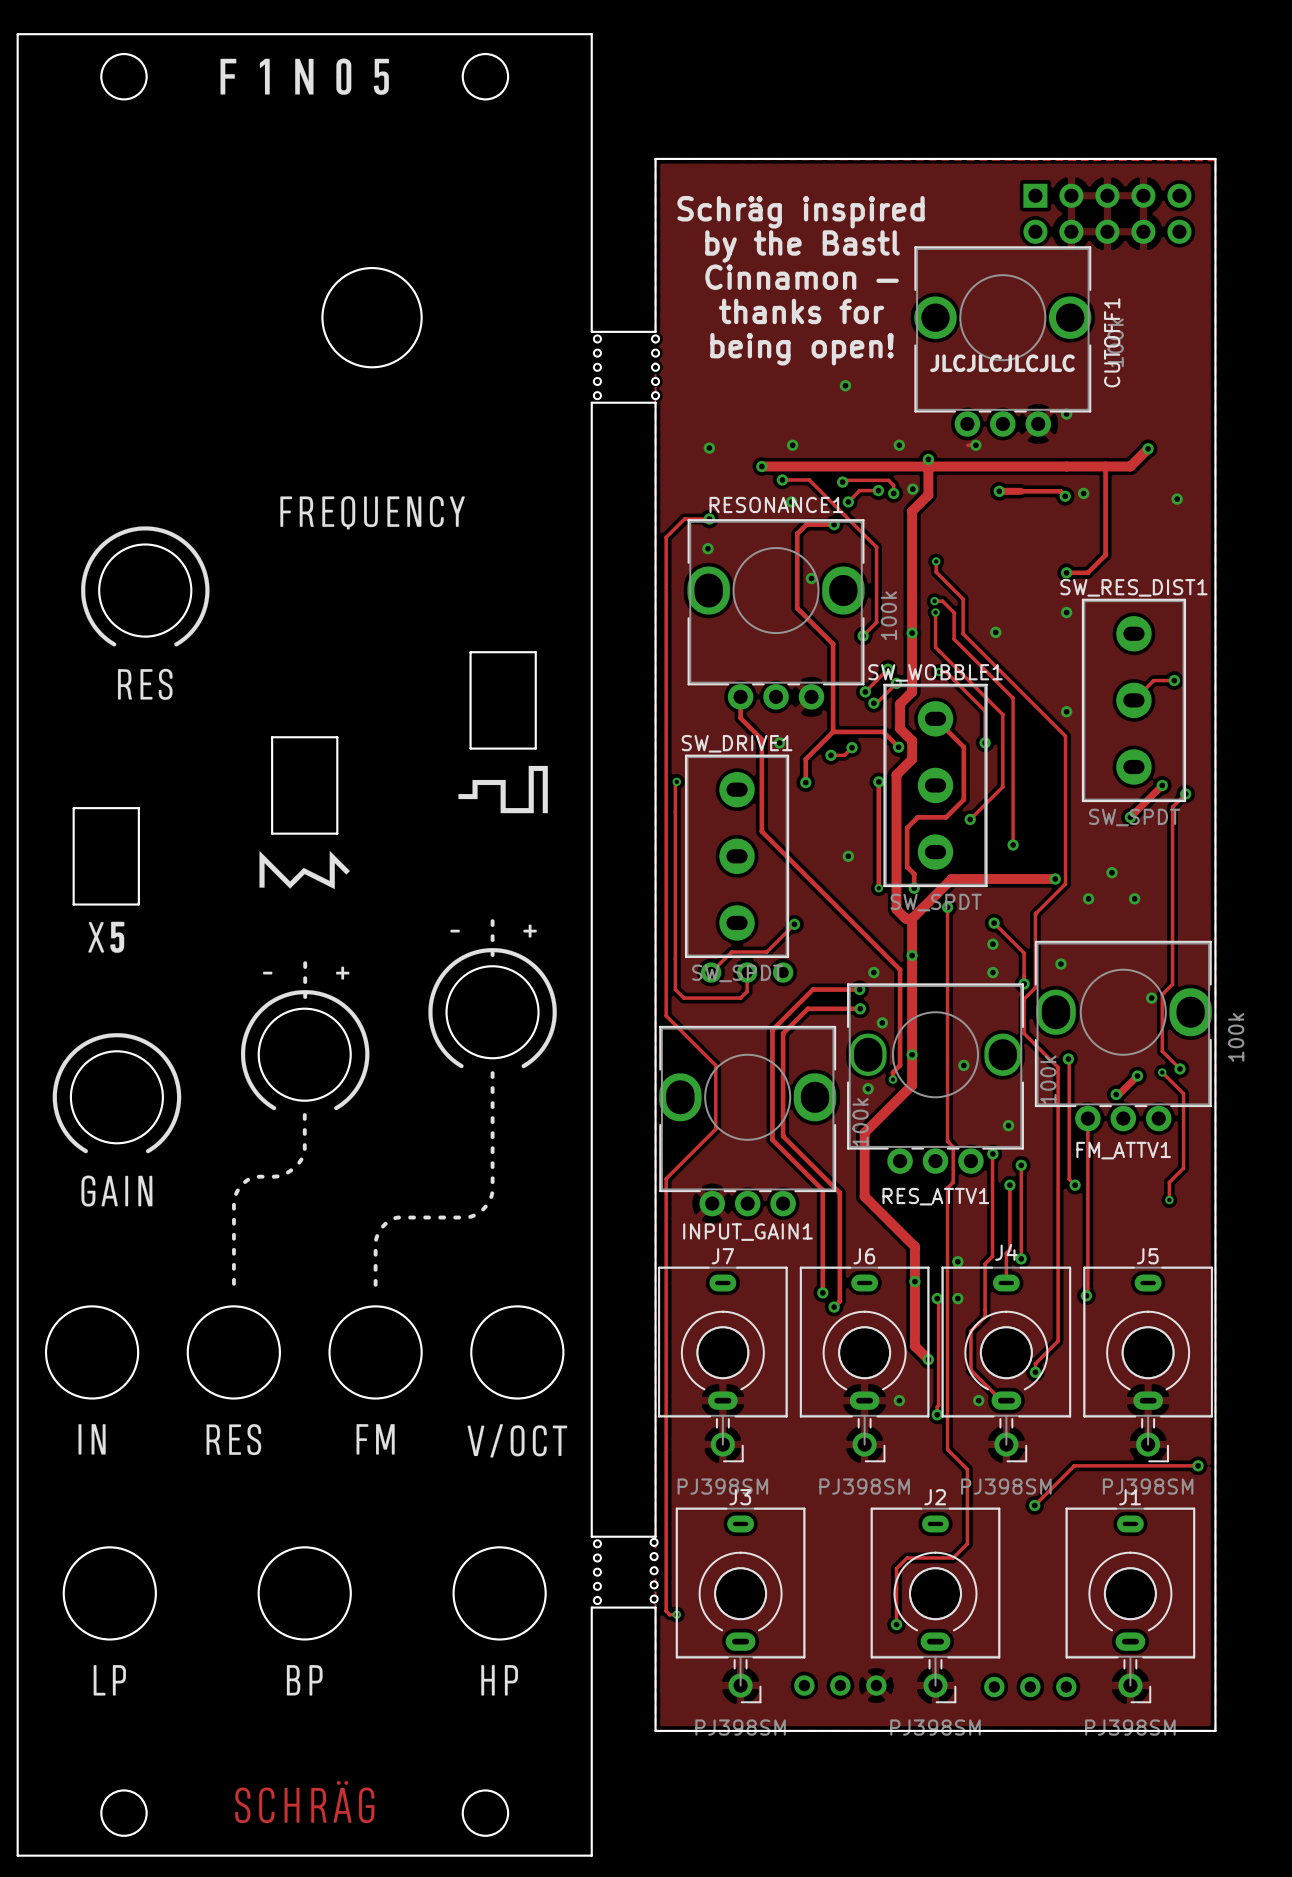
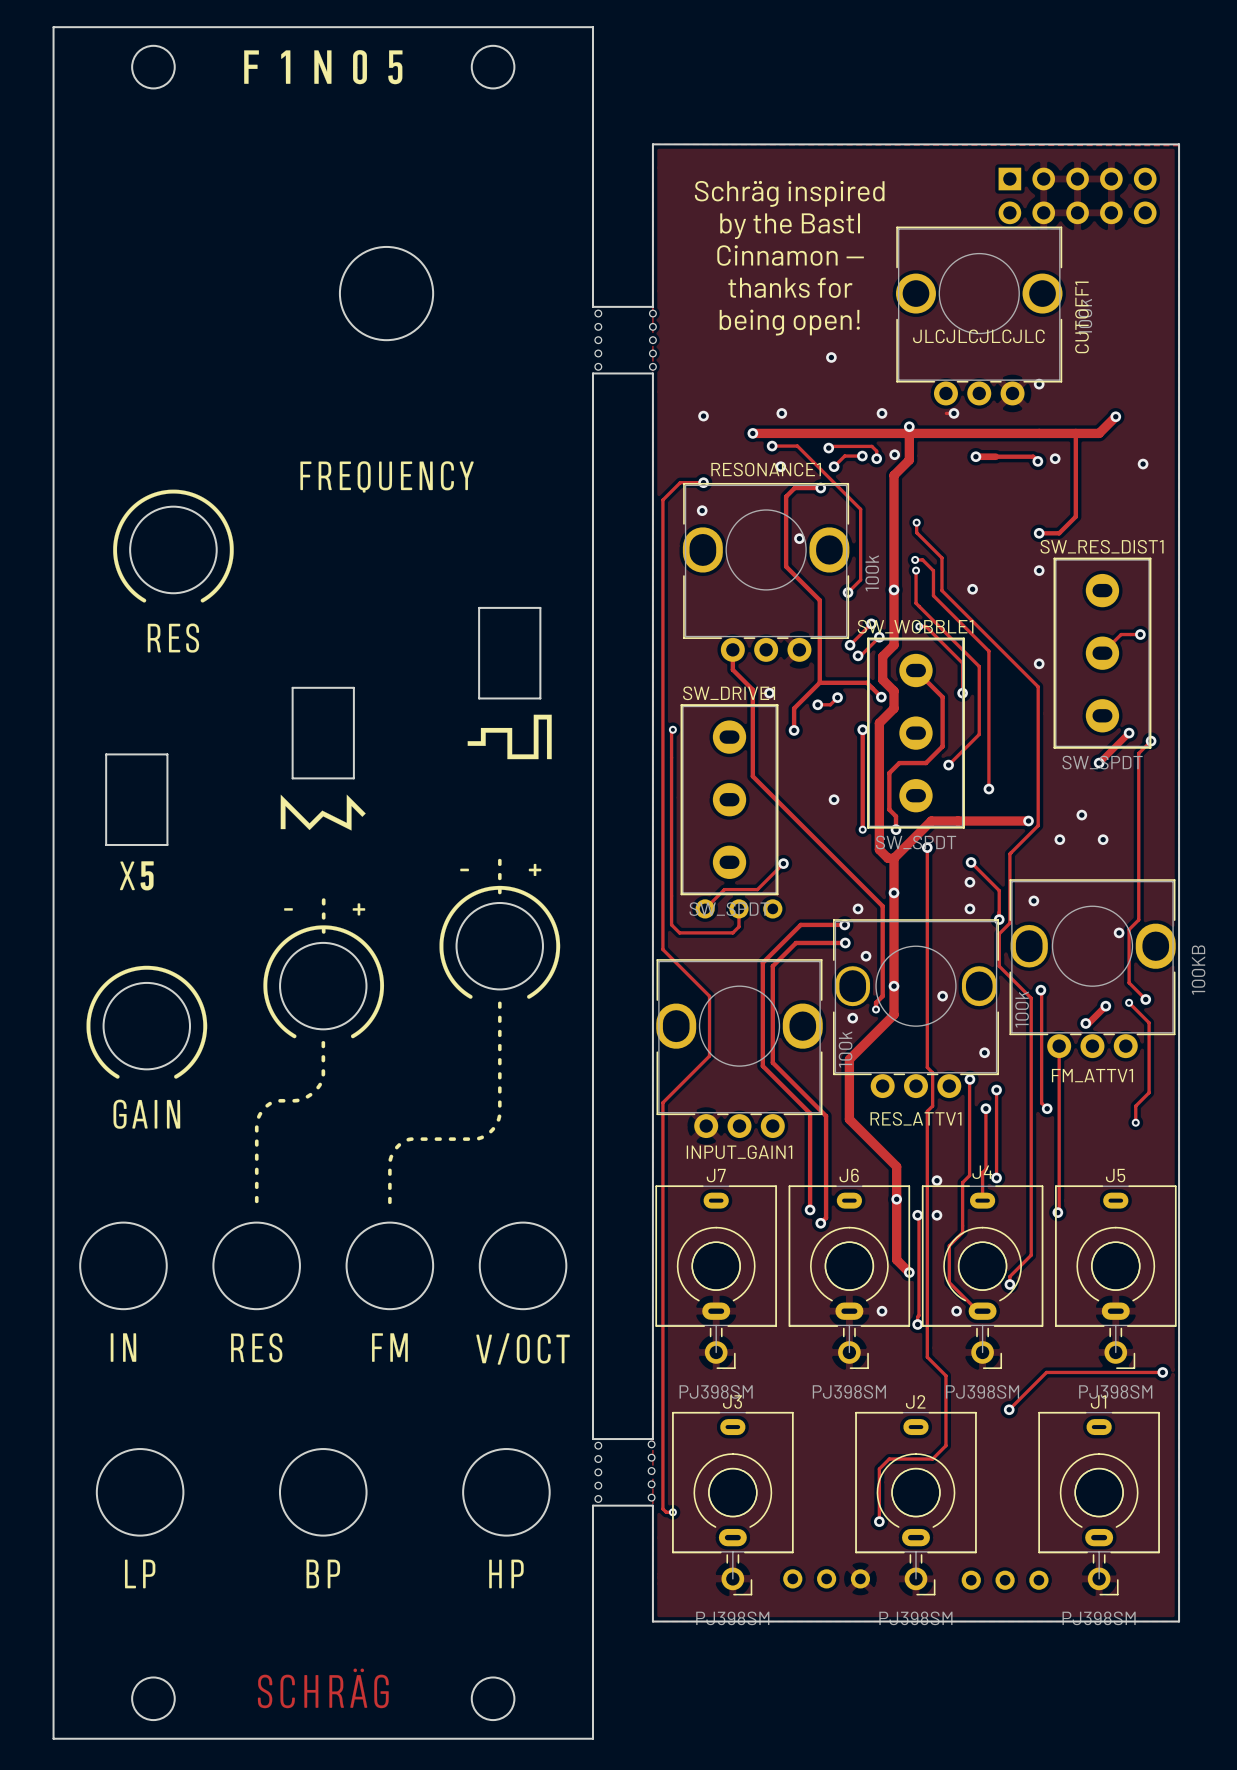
FM_ATTV1 value: 100k (1236, 1037) -> 100KB (1198, 969)

